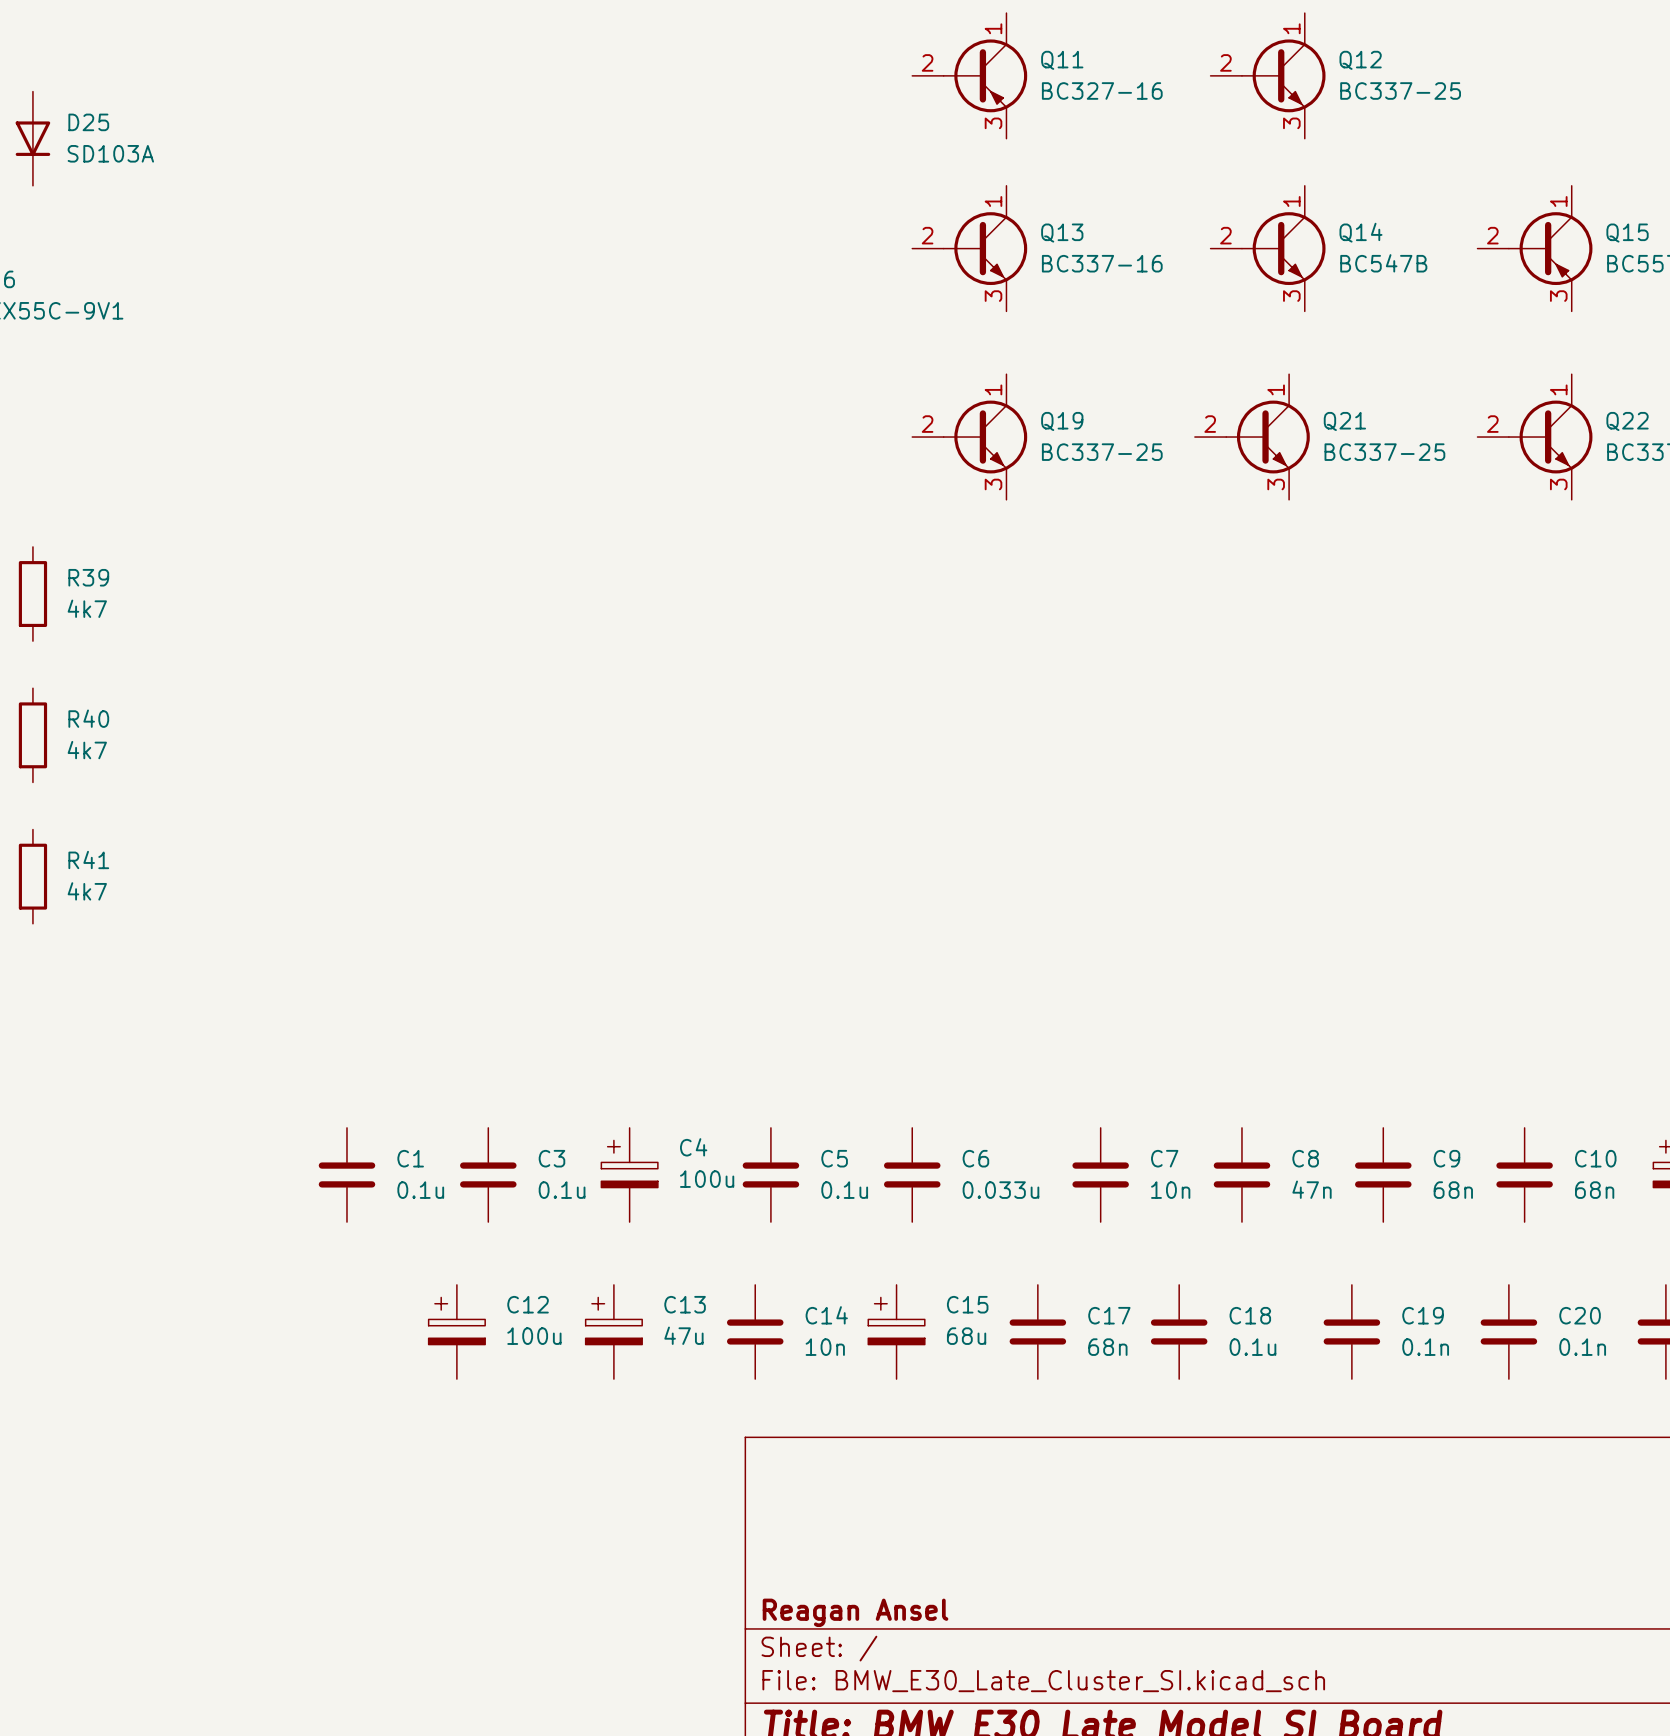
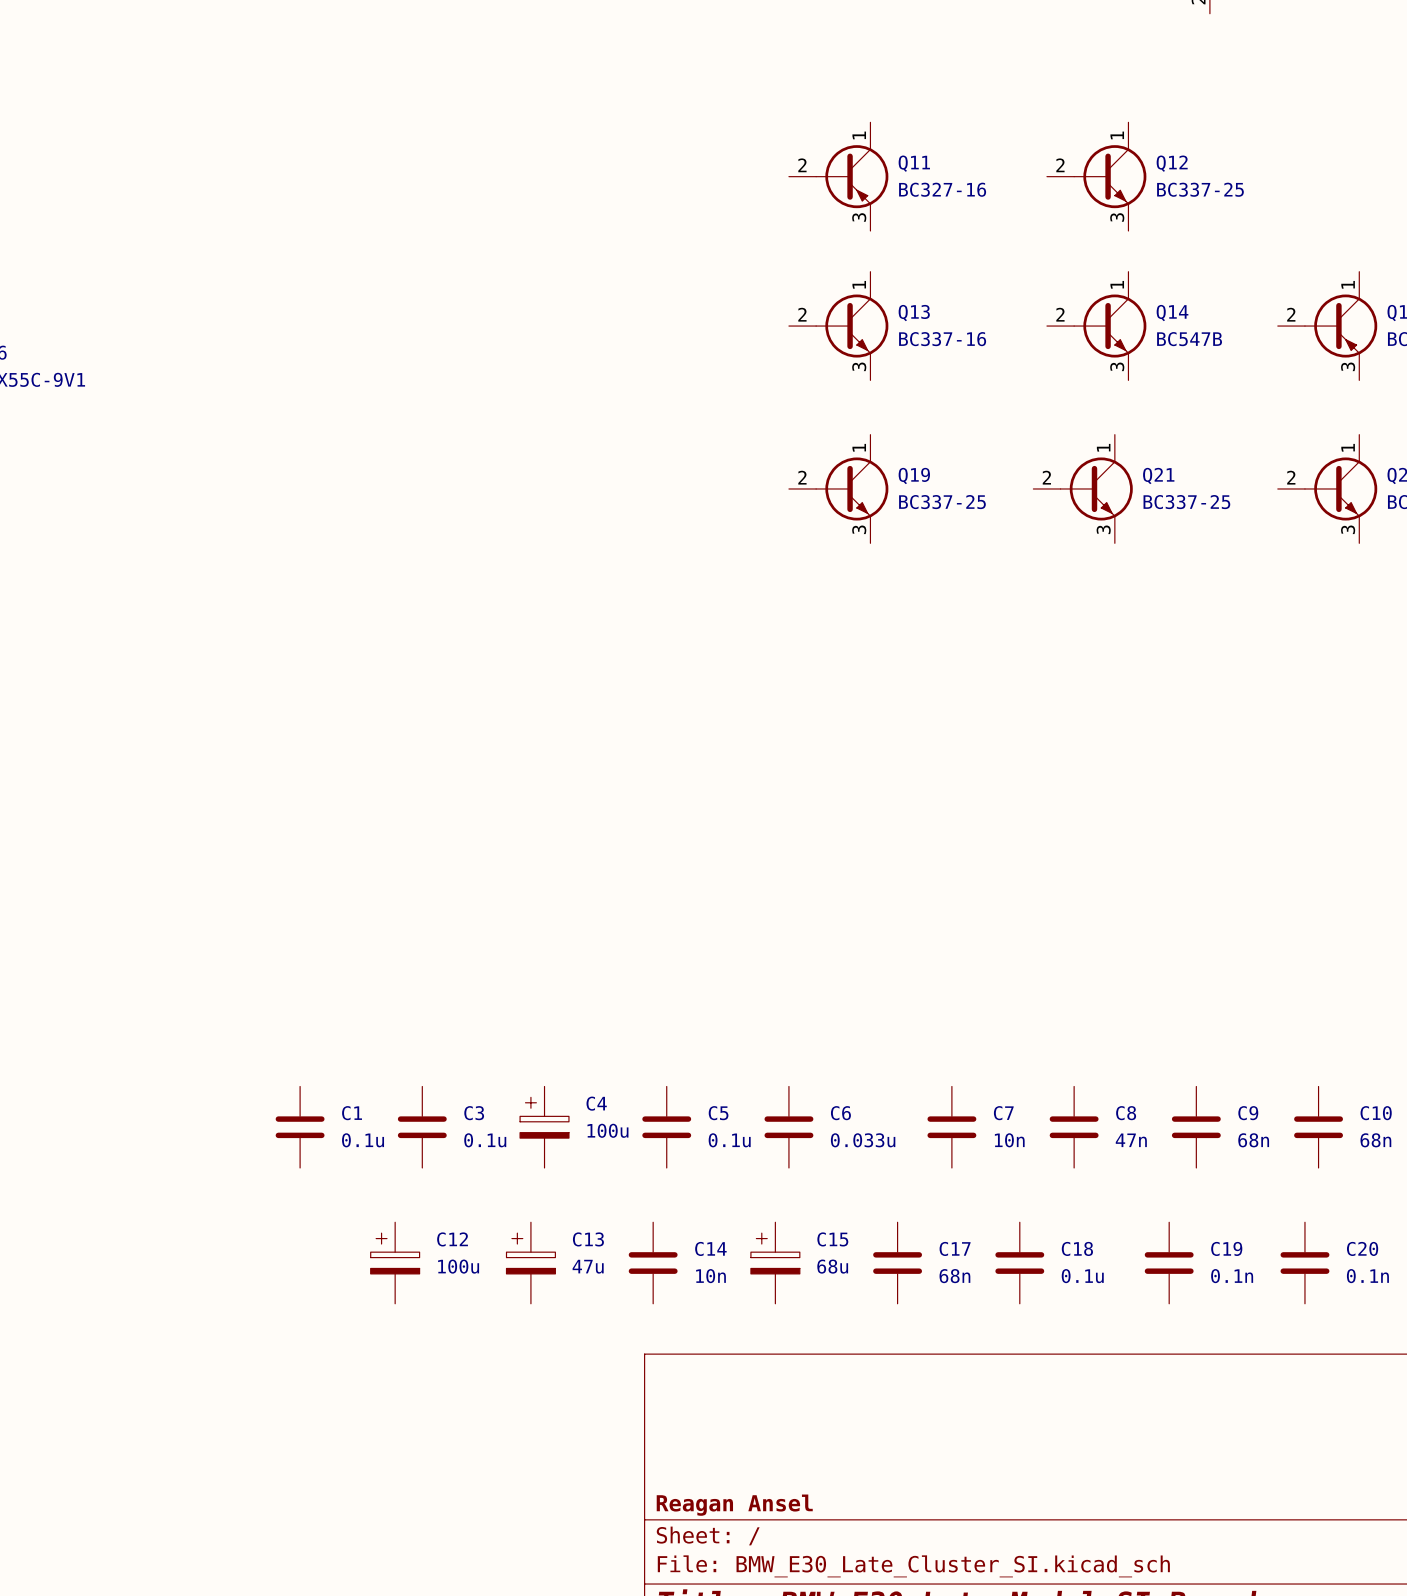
D25: SD103A (32, 138) -> none
R39: 4k7 (32, 594) -> none
R40: 4k7 (32, 735) -> none
R41: 4k7 (32, 876) -> none

